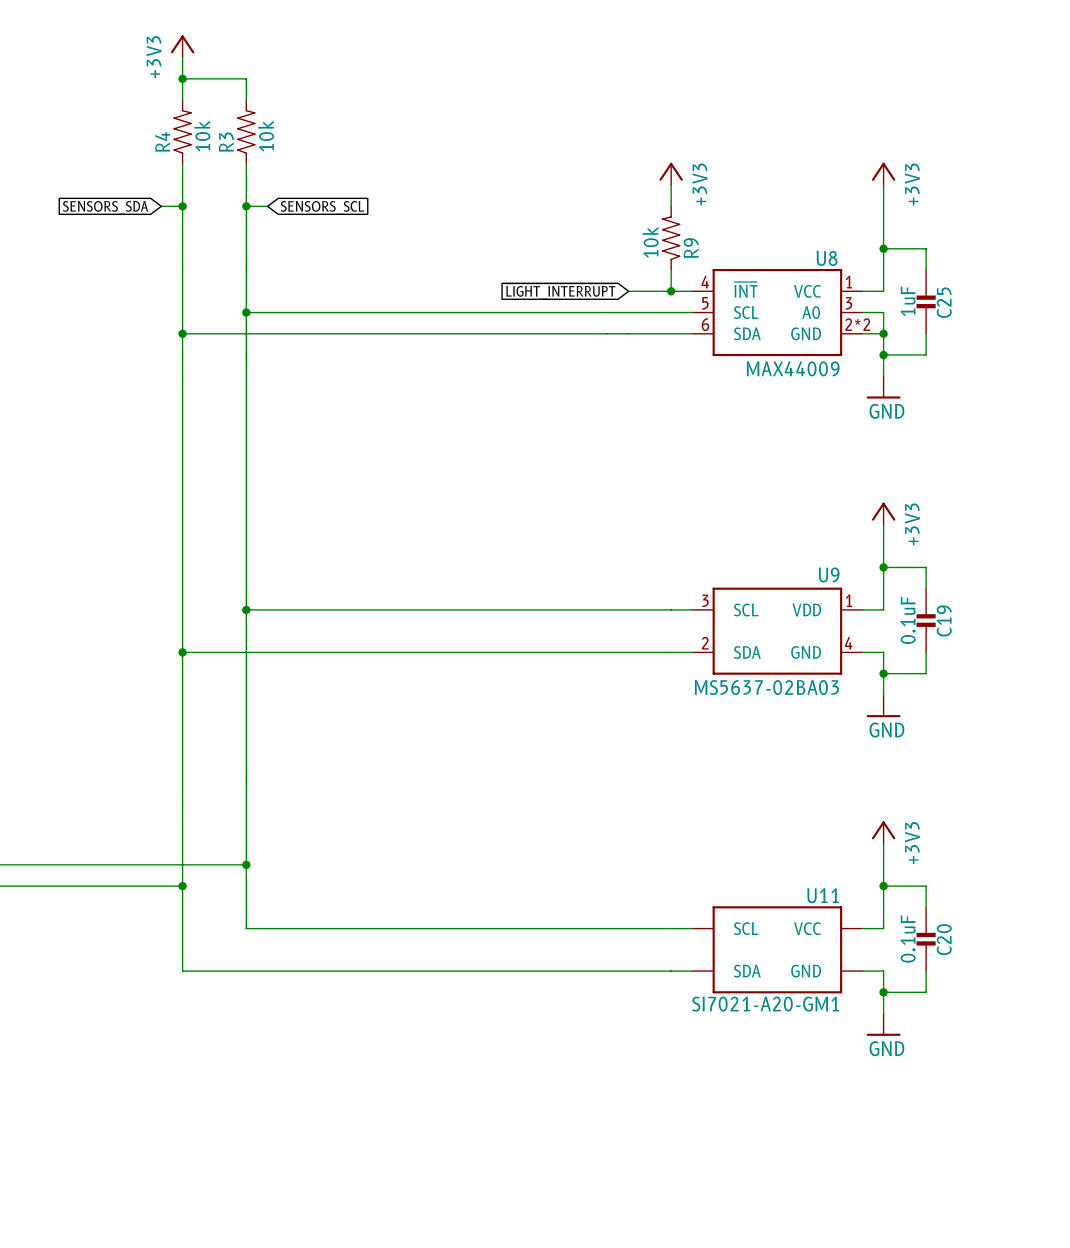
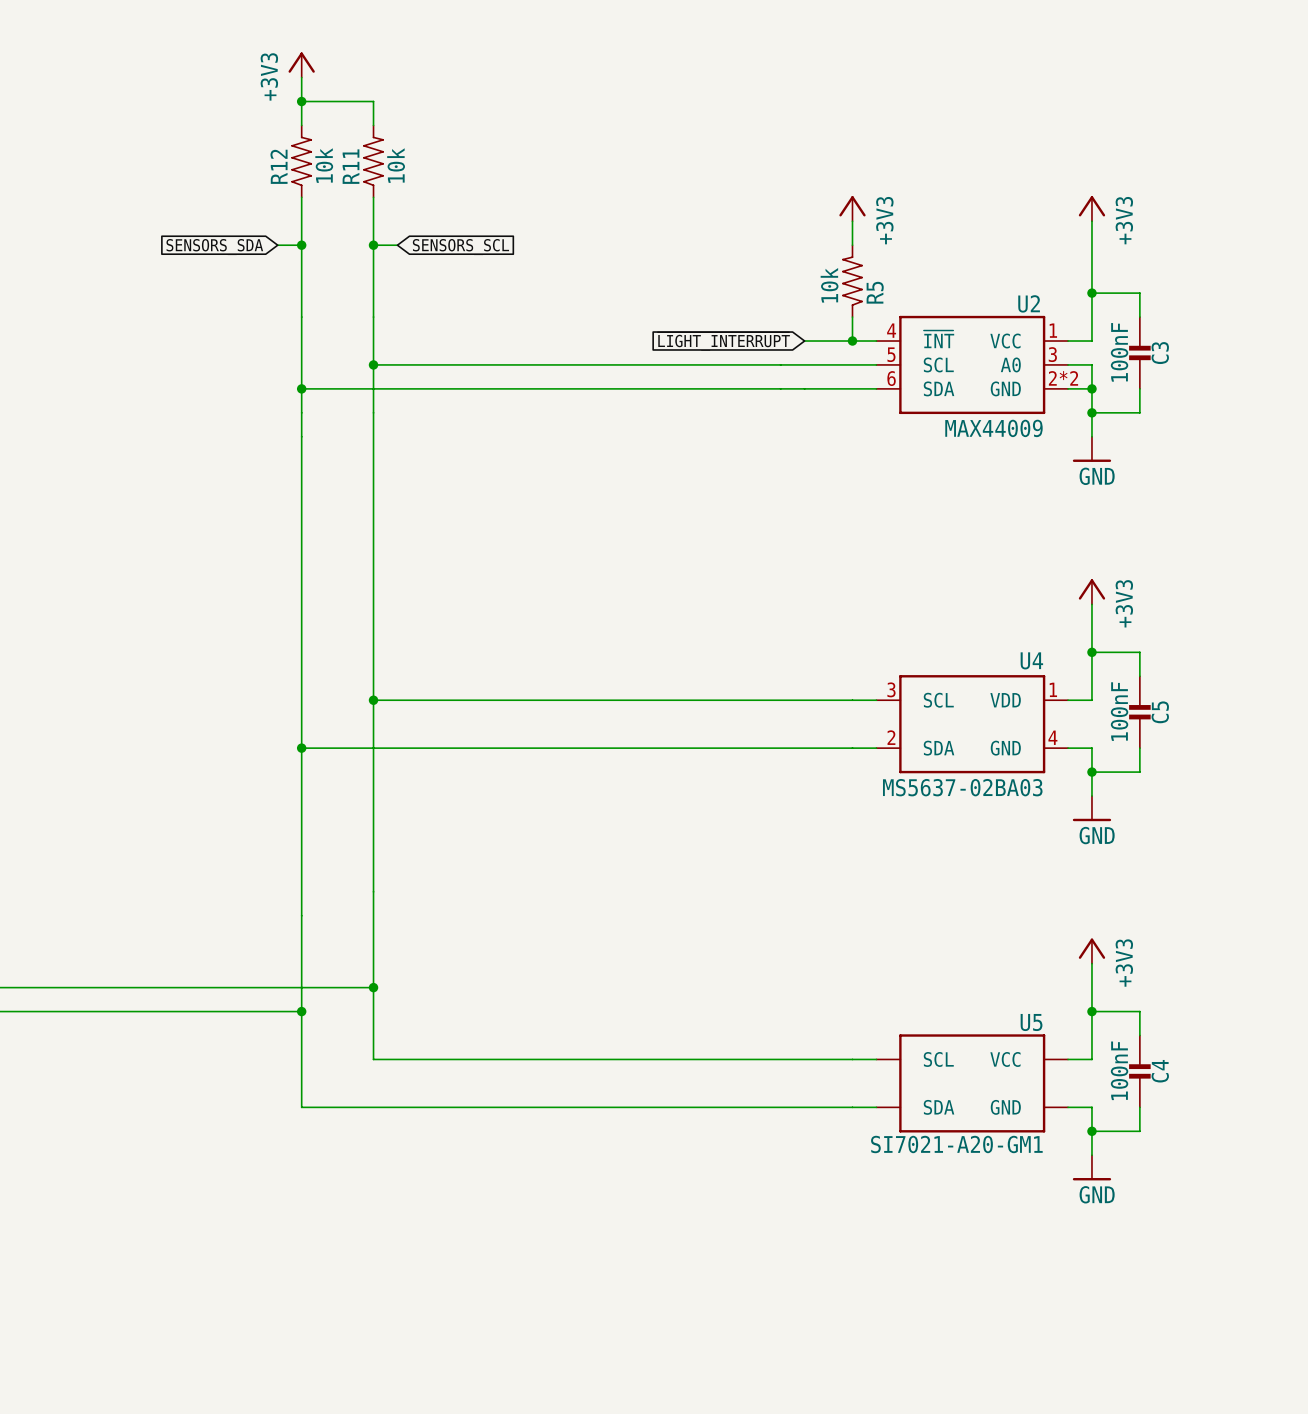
R4 name: R4 (162, 141) -> R12 (279, 166)
R3 name: R3 (226, 142) -> R11 (351, 166)
R9 name: R9 (691, 248) -> R5 (875, 292)
U8 name: U8 (827, 258) -> U2 (1029, 303)
C25 value: 1uF (908, 301) -> 100nF (1119, 352)
C25 name: C25 (944, 302) -> C3 (1160, 353)
U9 name: U9 (829, 574) -> U4 (1031, 660)
C19 value: 0.1uF (908, 620) -> 100nF (1119, 711)
C19 name: C19 (944, 620) -> C5 (1160, 712)
U11 name: U11 (823, 895) -> U5 (1031, 1022)
C20 value: 0.1uF (908, 939) -> 100nF (1119, 1070)
C20 name: C20 (944, 939) -> C4 (1160, 1071)

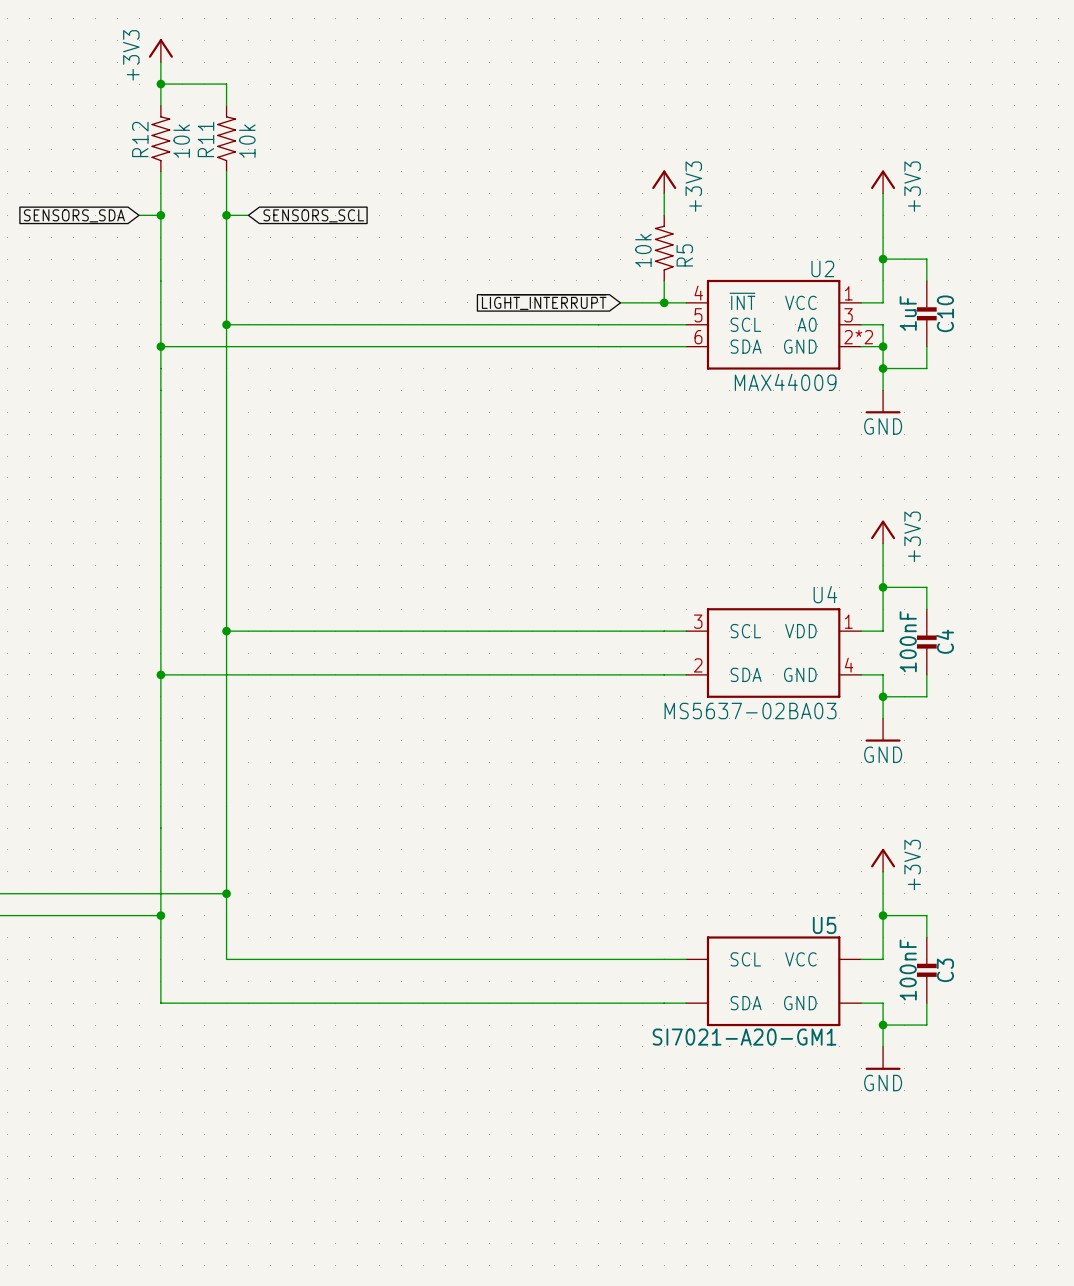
C3 value: 100nF (1119, 352) -> 1uF (908, 313)
C3 name: C3 (1160, 353) -> C10 (945, 313)
C5 name: C5 (1160, 712) -> C4 (945, 641)
C4 name: C4 (1160, 1071) -> C3 (945, 970)

